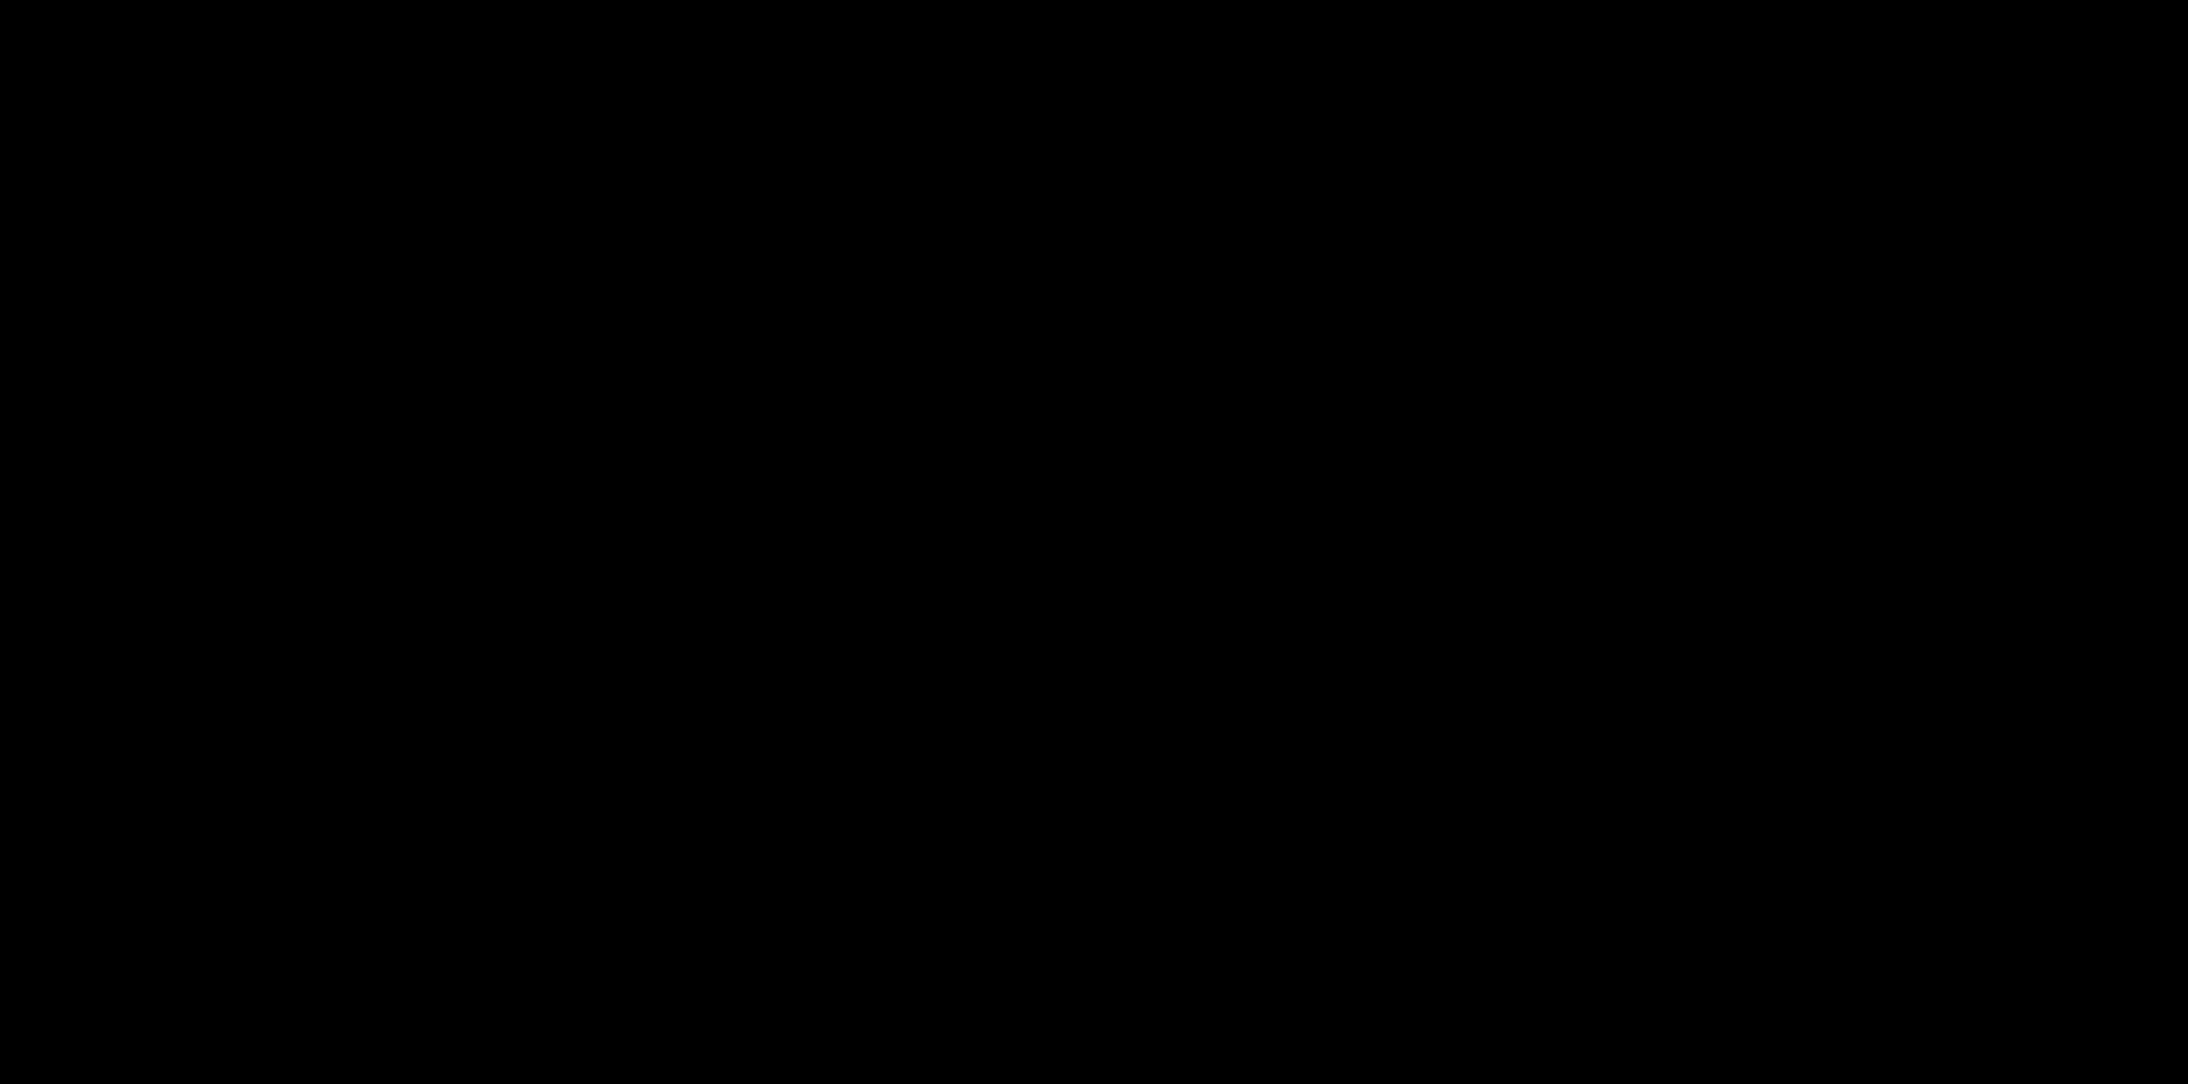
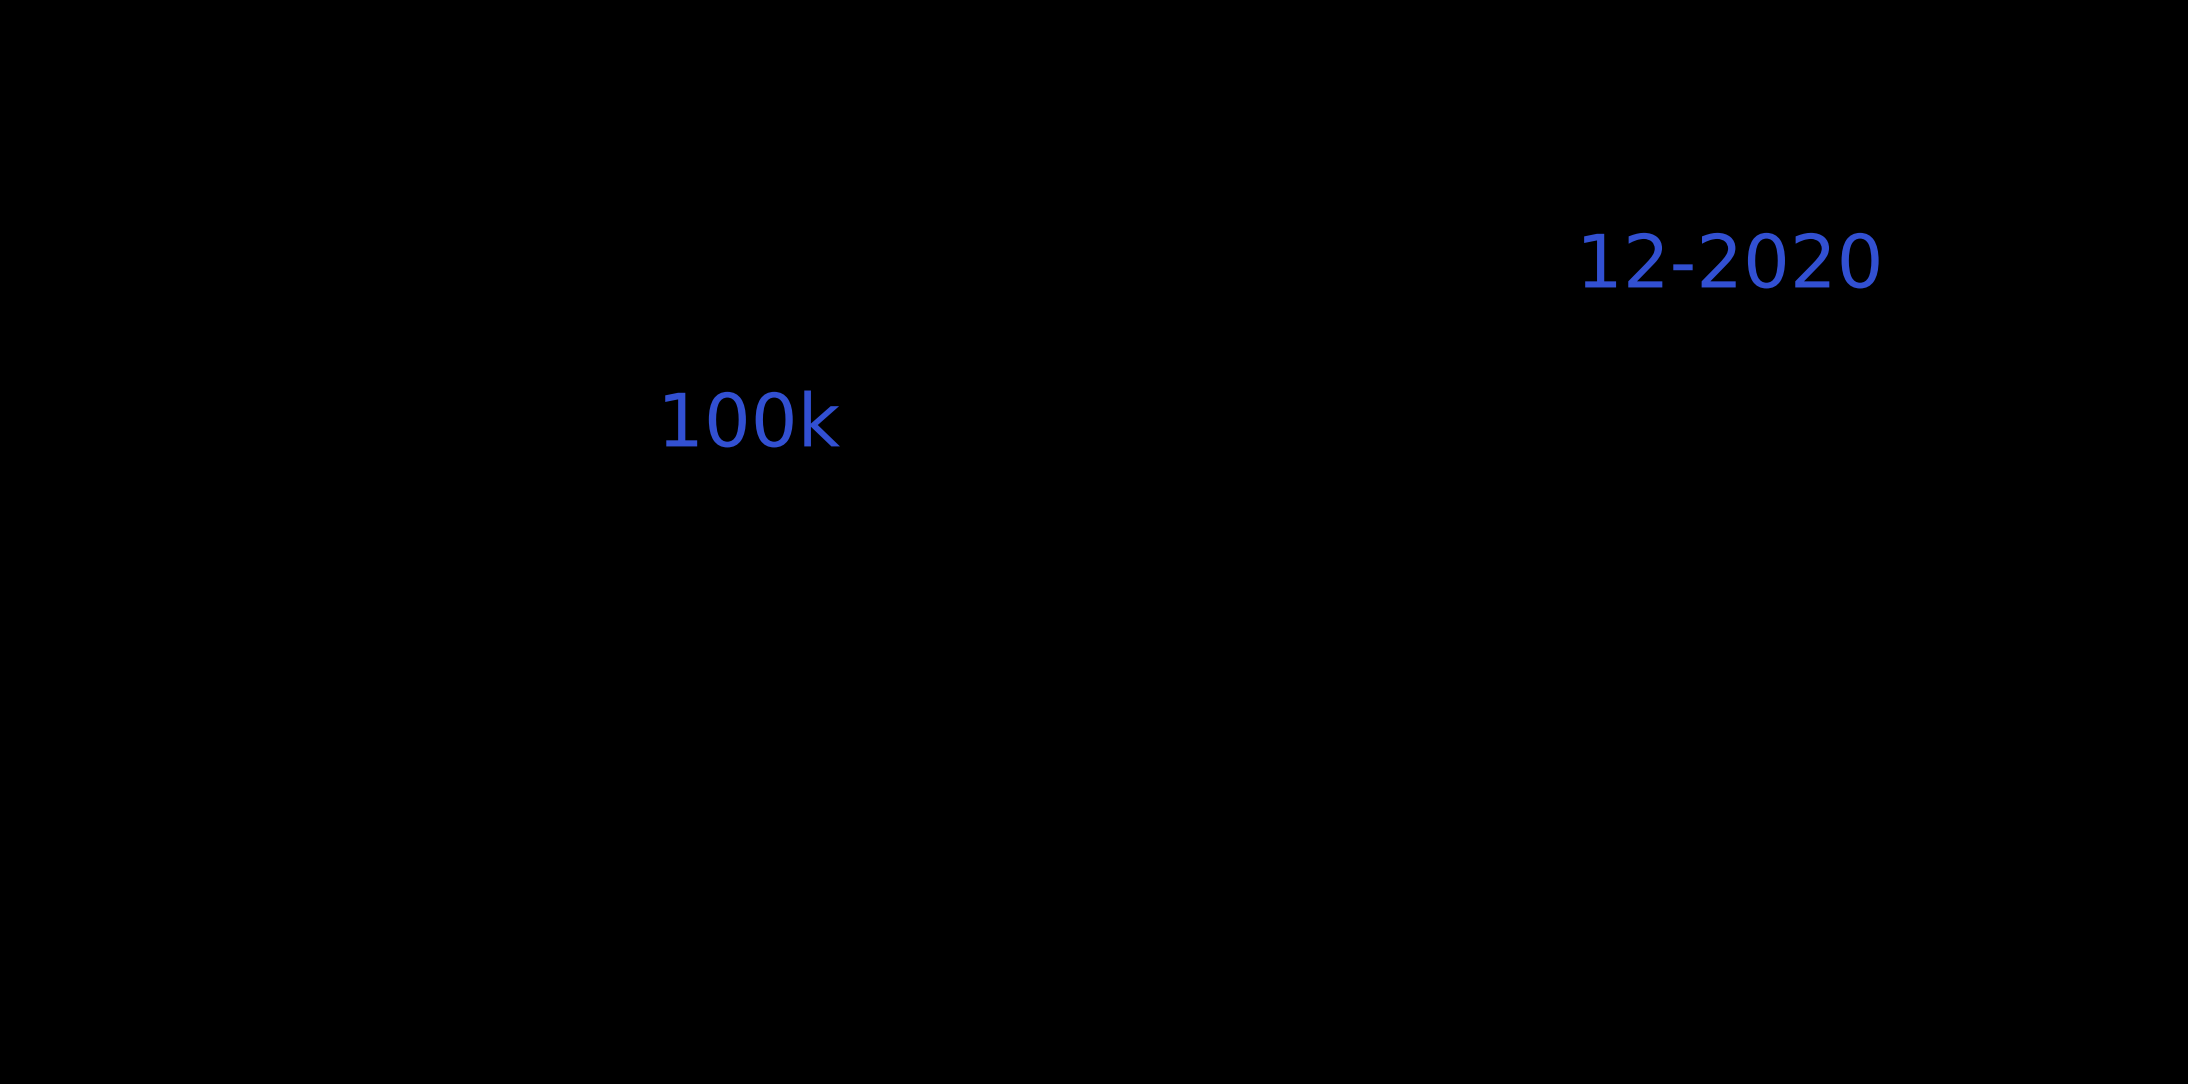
text: none -> 12-2020 (1731, 260)
text: none -> 100k (752, 418)

